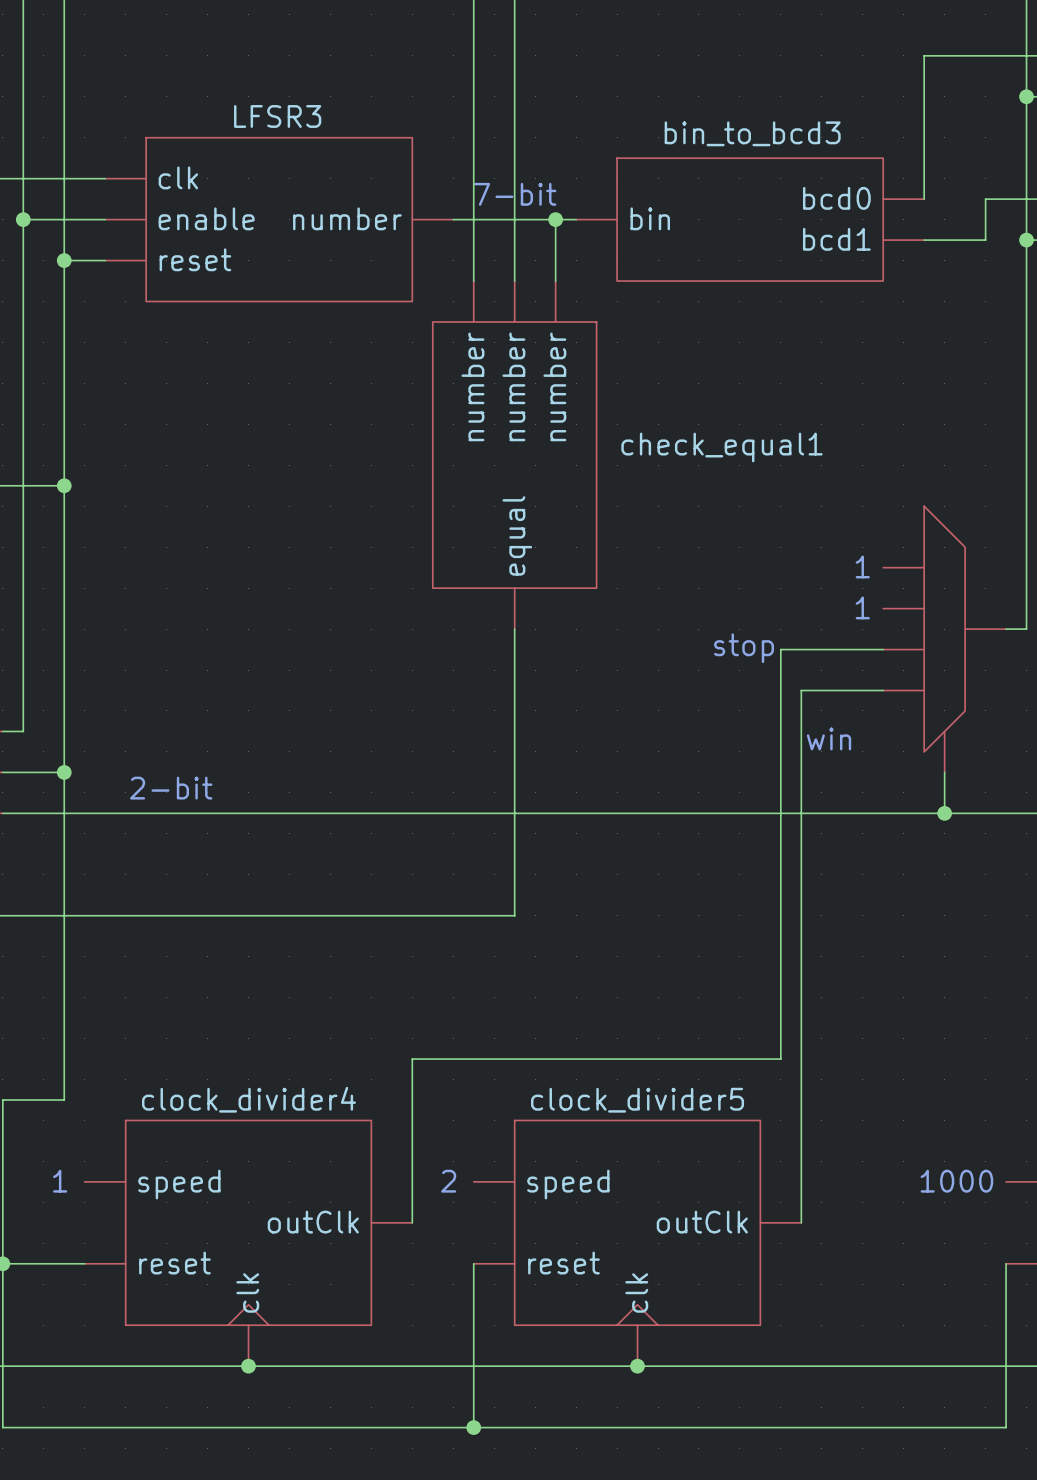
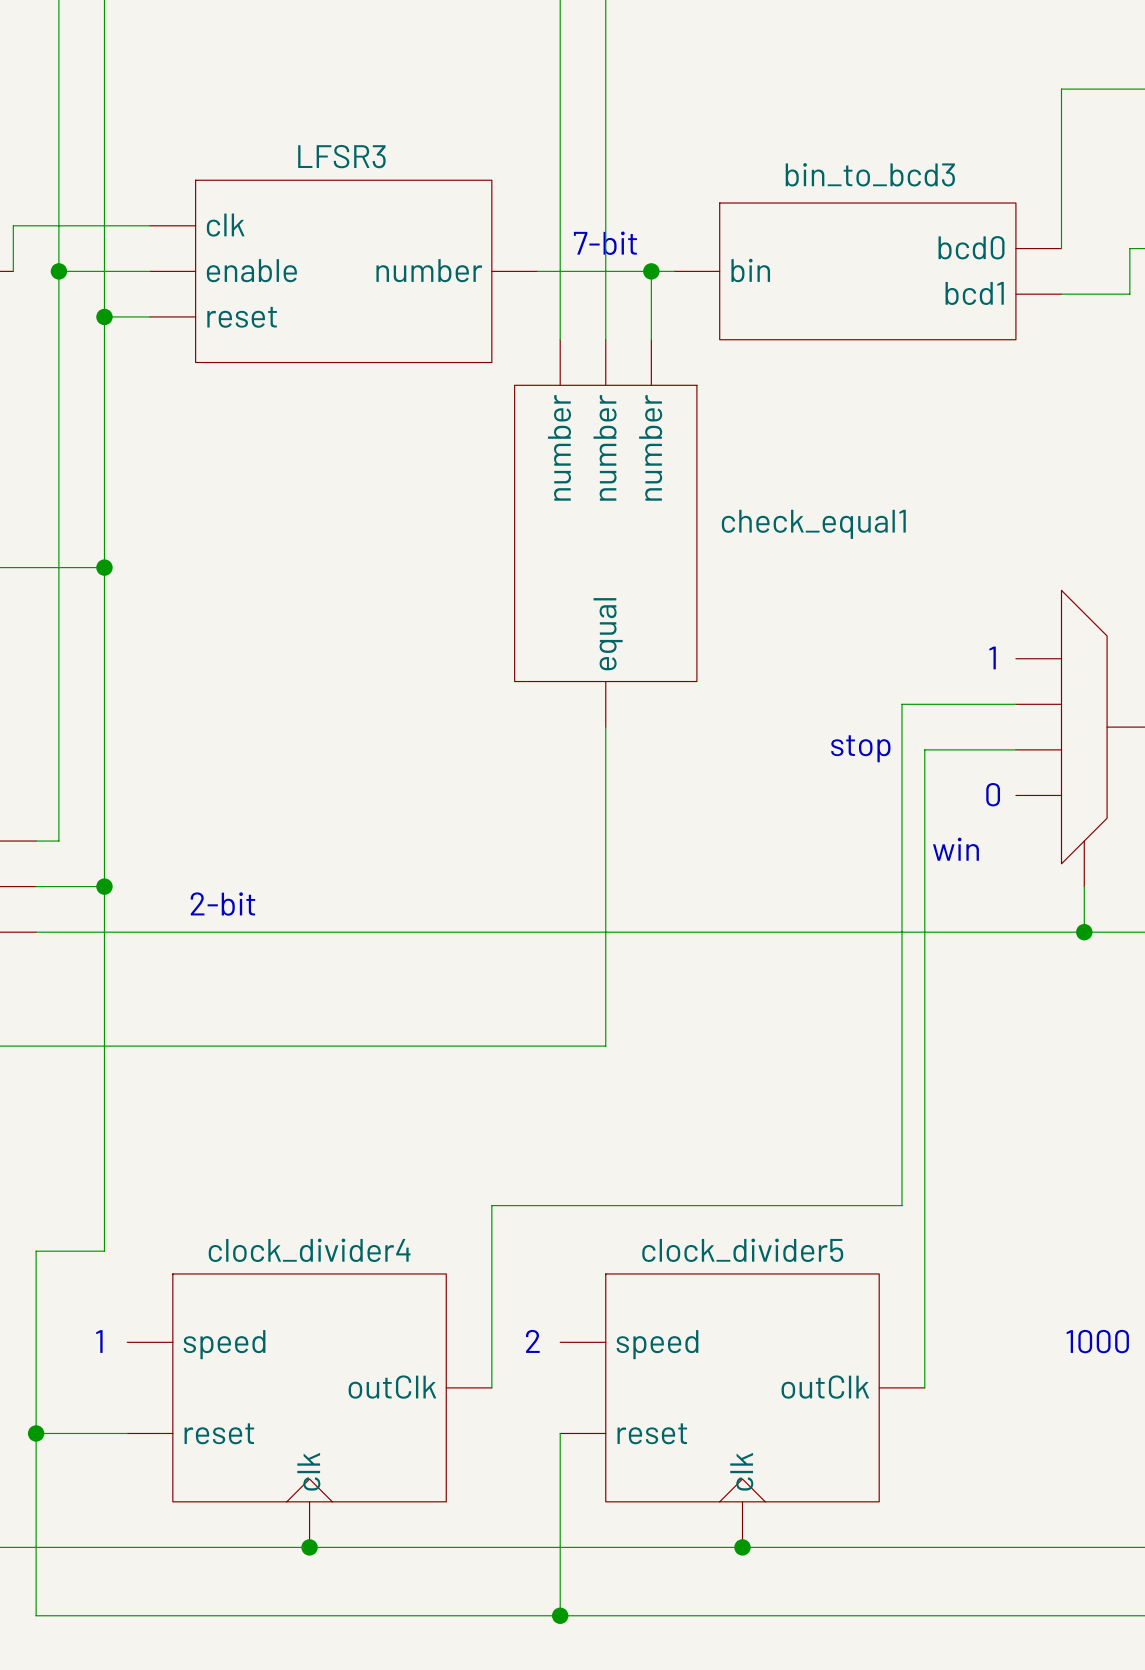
text: 1 (862, 607) -> none
wire: none -> (1015, 704) (901, 704) (901, 749)
wire: (780, 649) (801, 649) -> (924, 795) (924, 749)
text: none -> 0 (993, 794)
wire: (801, 690) (883, 690) -> none

